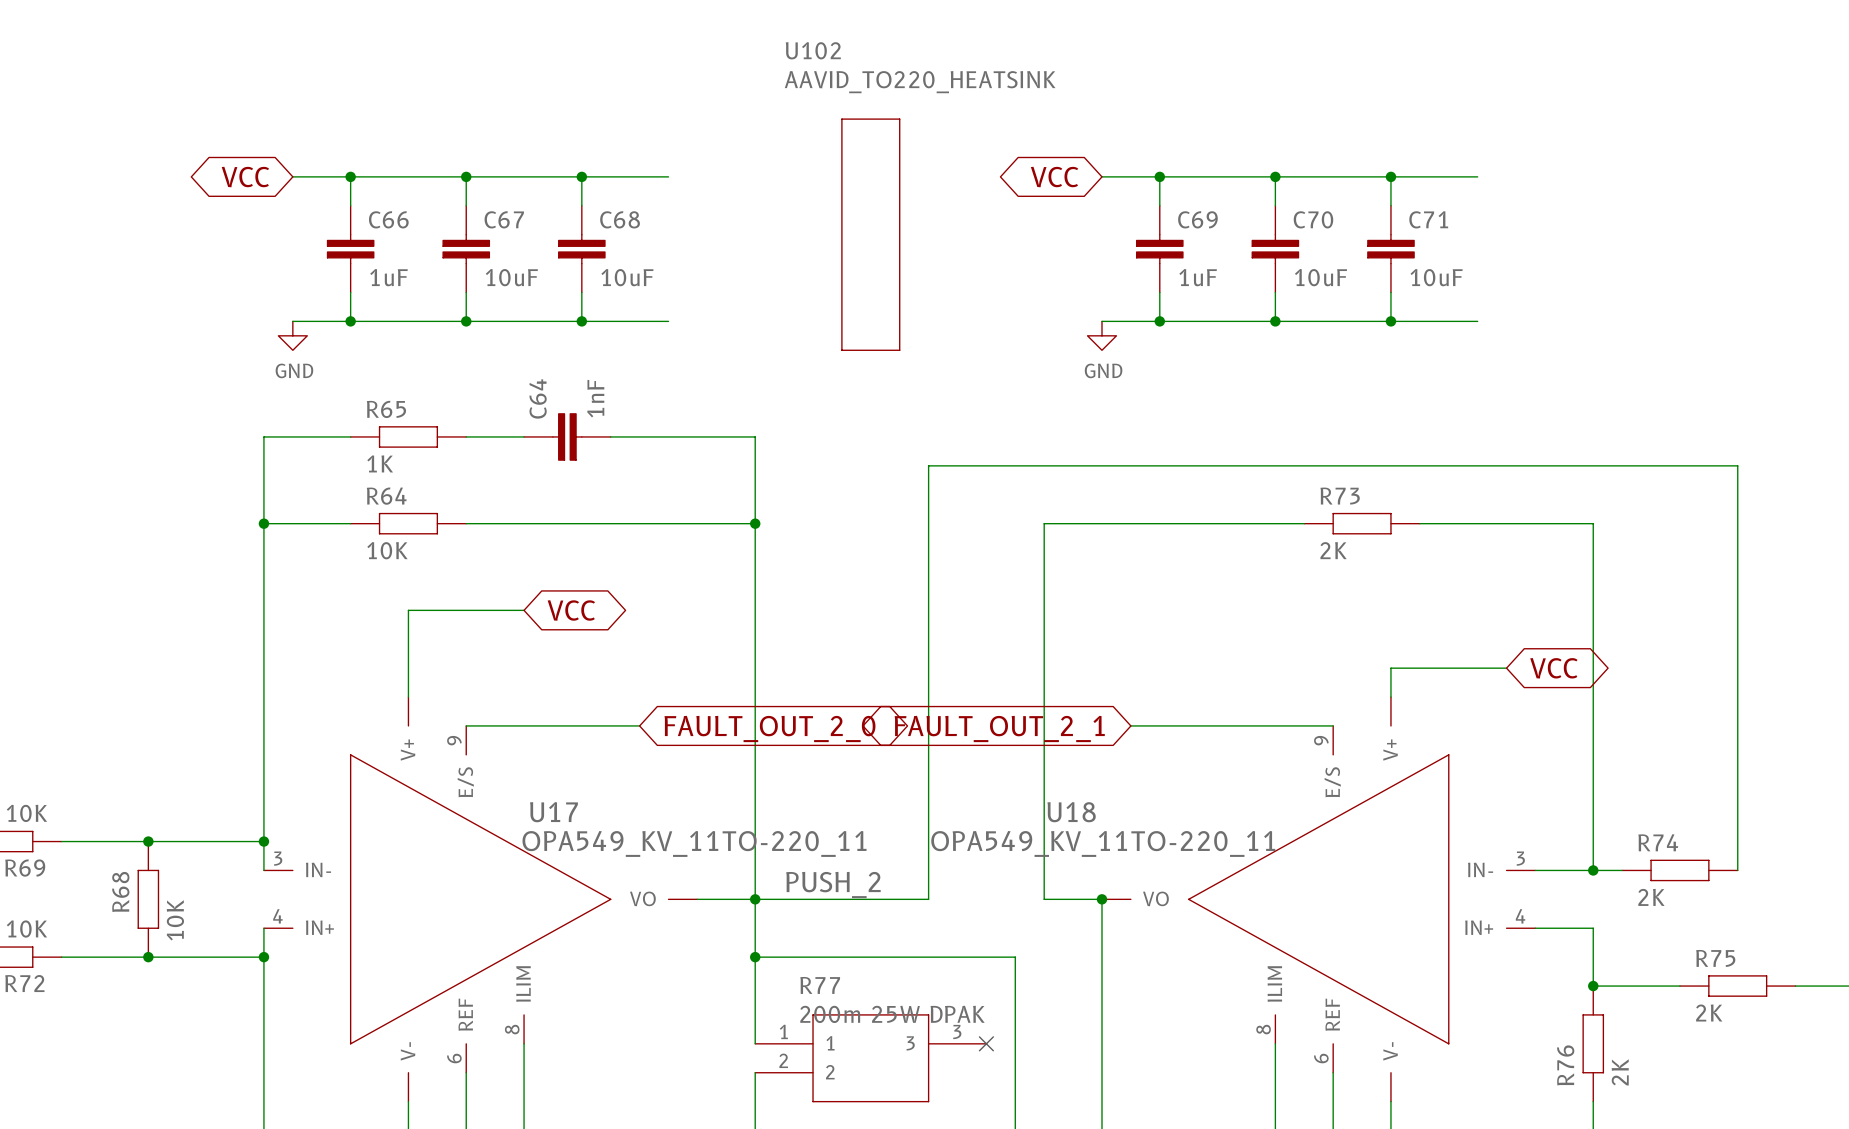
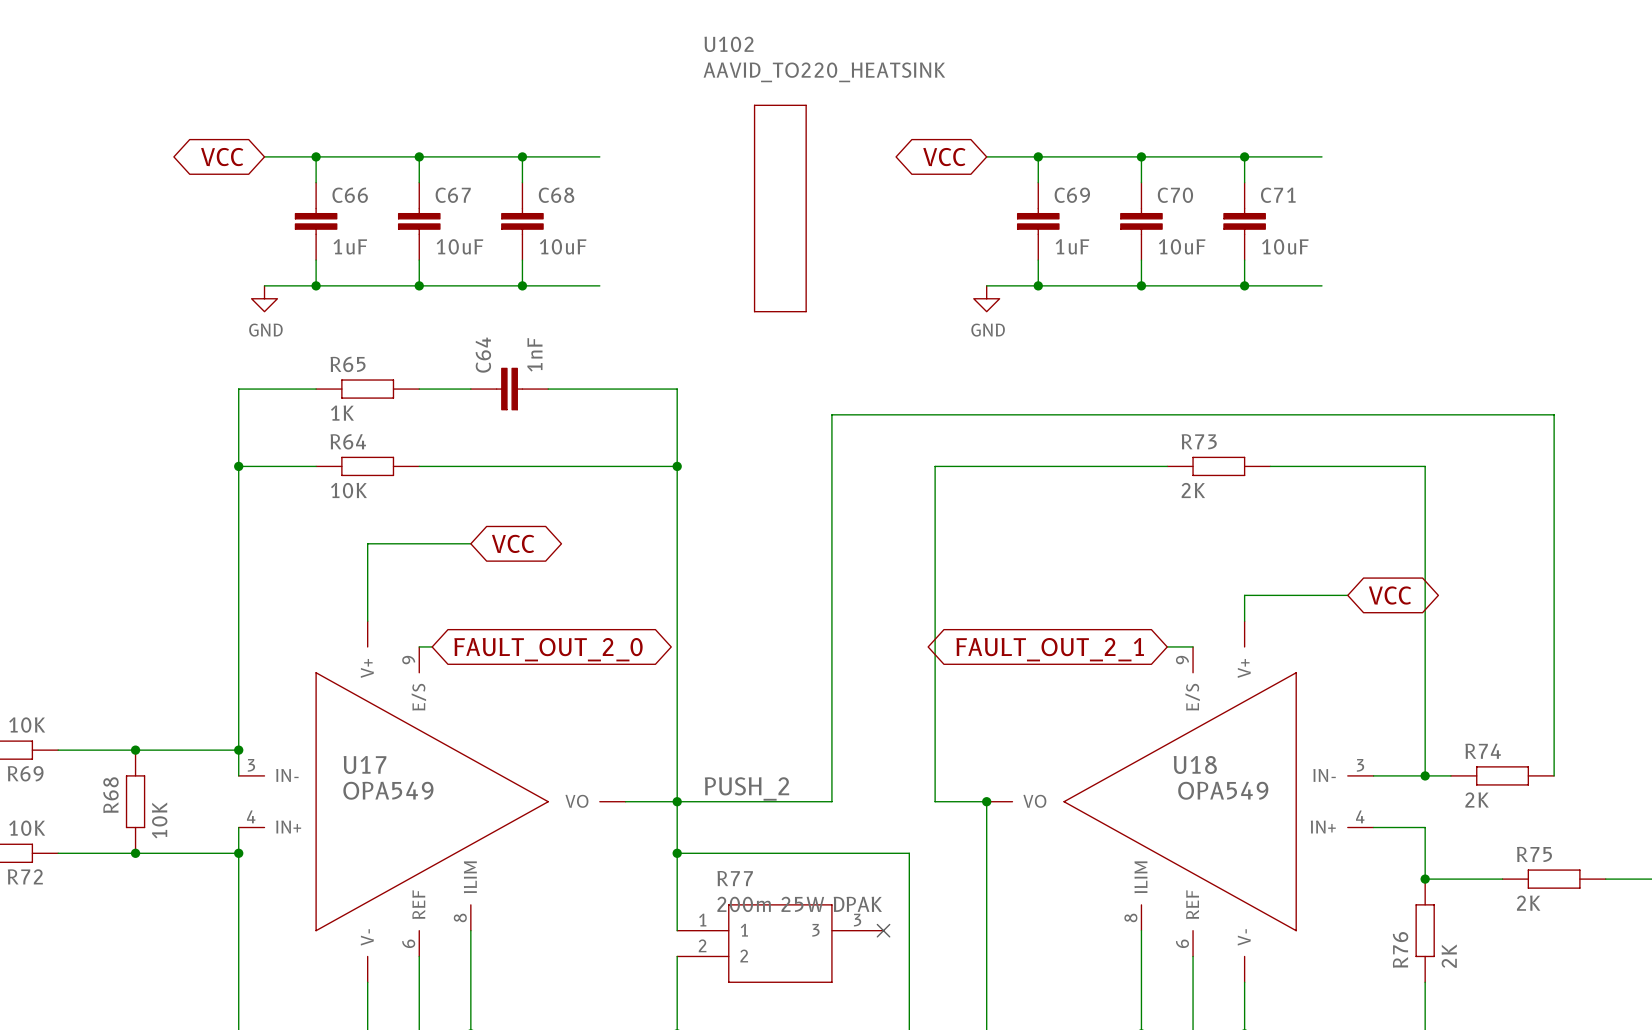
wire: (480, 725) (639, 725) -> none
wire: (1130, 725) (1304, 725) -> none
global label position: FAULT_OUT_2_0 (769, 728) -> FAULT_OUT_2_0 (548, 649)
global label position: FAULT_OUT_2_1 (999, 728) -> FAULT_OUT_2_1 (1050, 649)
U17 name position: U17 (553, 812) -> U17 (365, 764)
U18 name position: U18 (1071, 812) -> U18 (1195, 764)
U17 value: OPA549_KV_11TO-220_11 (694, 843) -> OPA549 (388, 790)
U18 value: OPA549_KV_11TO-220_11 (1103, 843) -> OPA549 (1223, 790)

